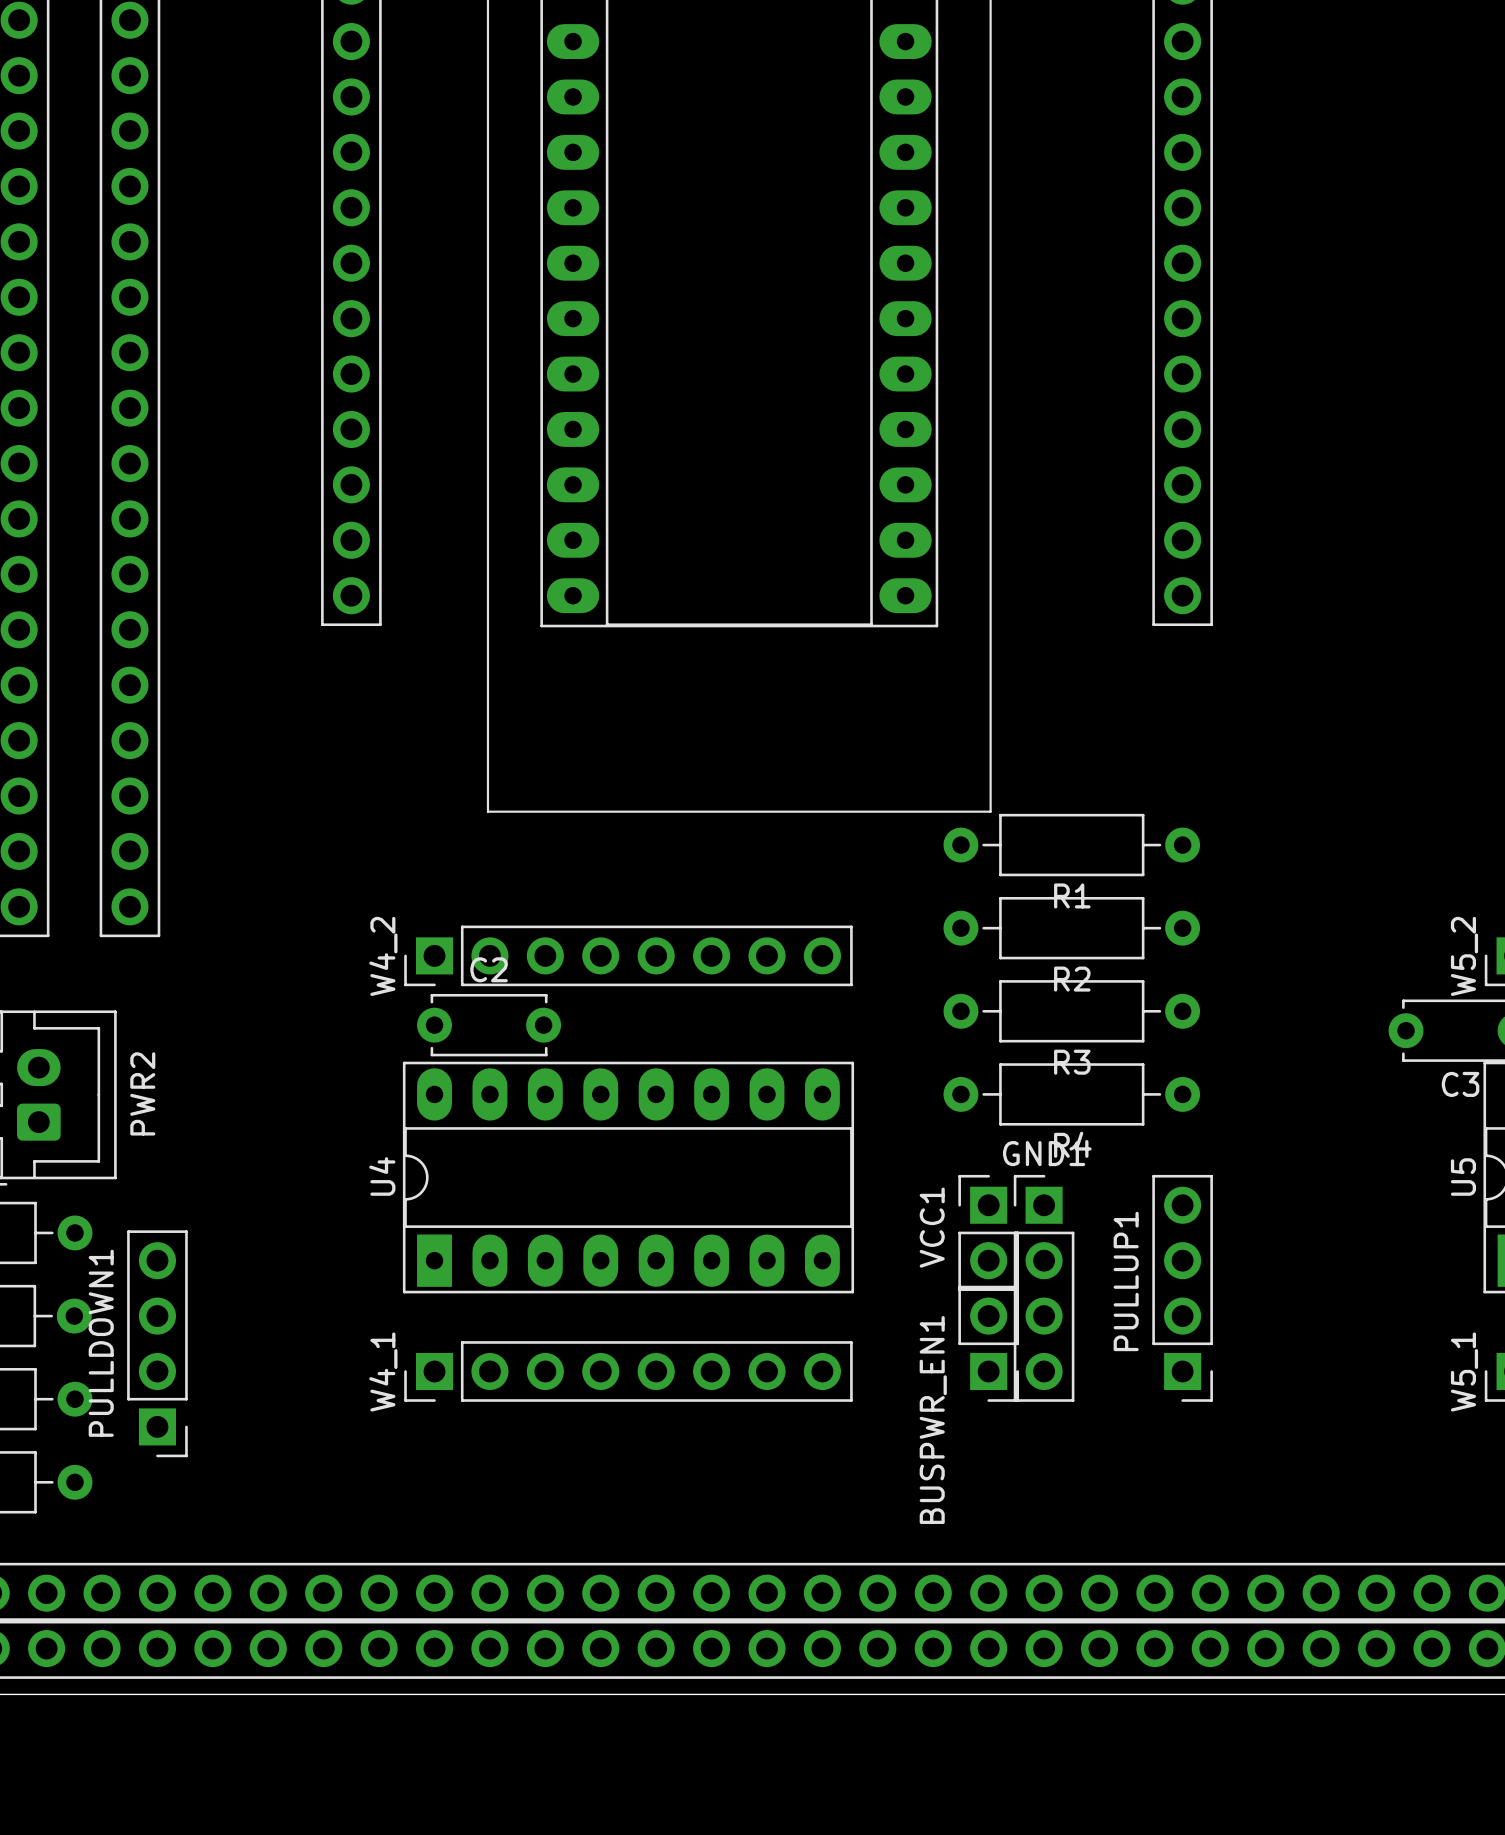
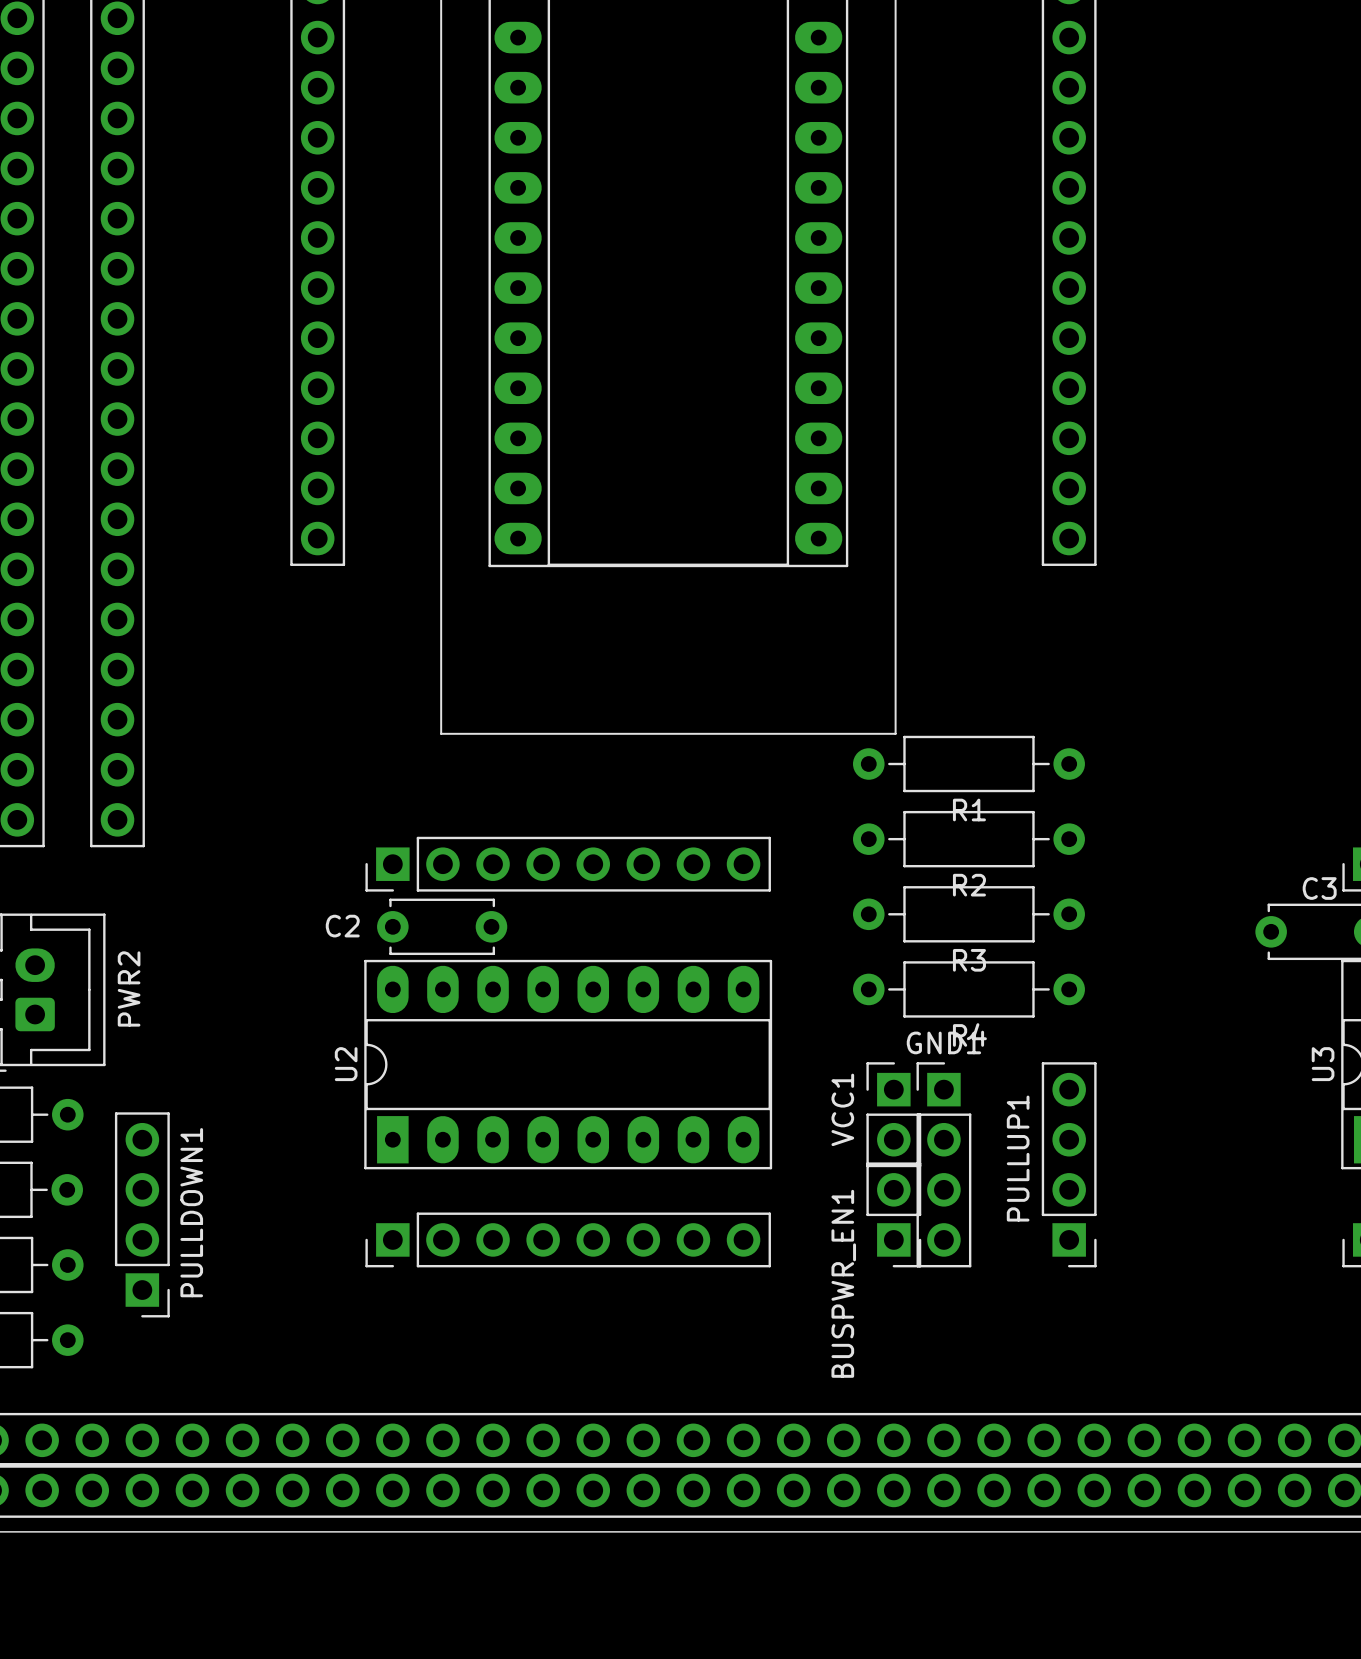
W4_2 name: W4_2 (383, 956) -> none
W5_2 name: W5_2 (1464, 956) -> none
C2 name position: C2 (489, 969) -> C2 (342, 926)
C3 name position: C3 (1460, 1084) -> C3 (1319, 888)
U4 name: U4 (382, 1176) -> U2 (346, 1064)
U5 name: U5 (1463, 1177) -> U3 (1323, 1064)
PULLDOWN1 name position: PULLDOWN1 (101, 1343) -> PULLDOWN1 (191, 1212)
W4_1 name: W4_1 (383, 1372) -> none
W5_1 name: W5_1 (1464, 1372) -> none

